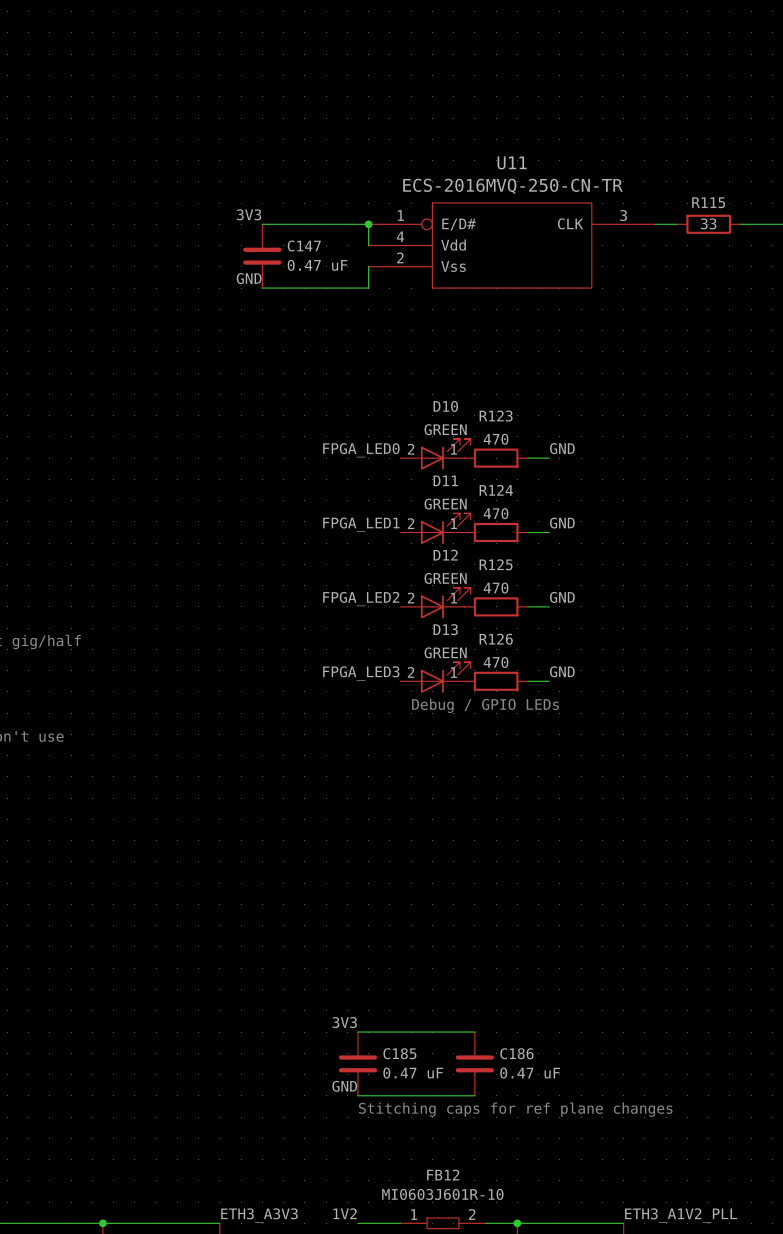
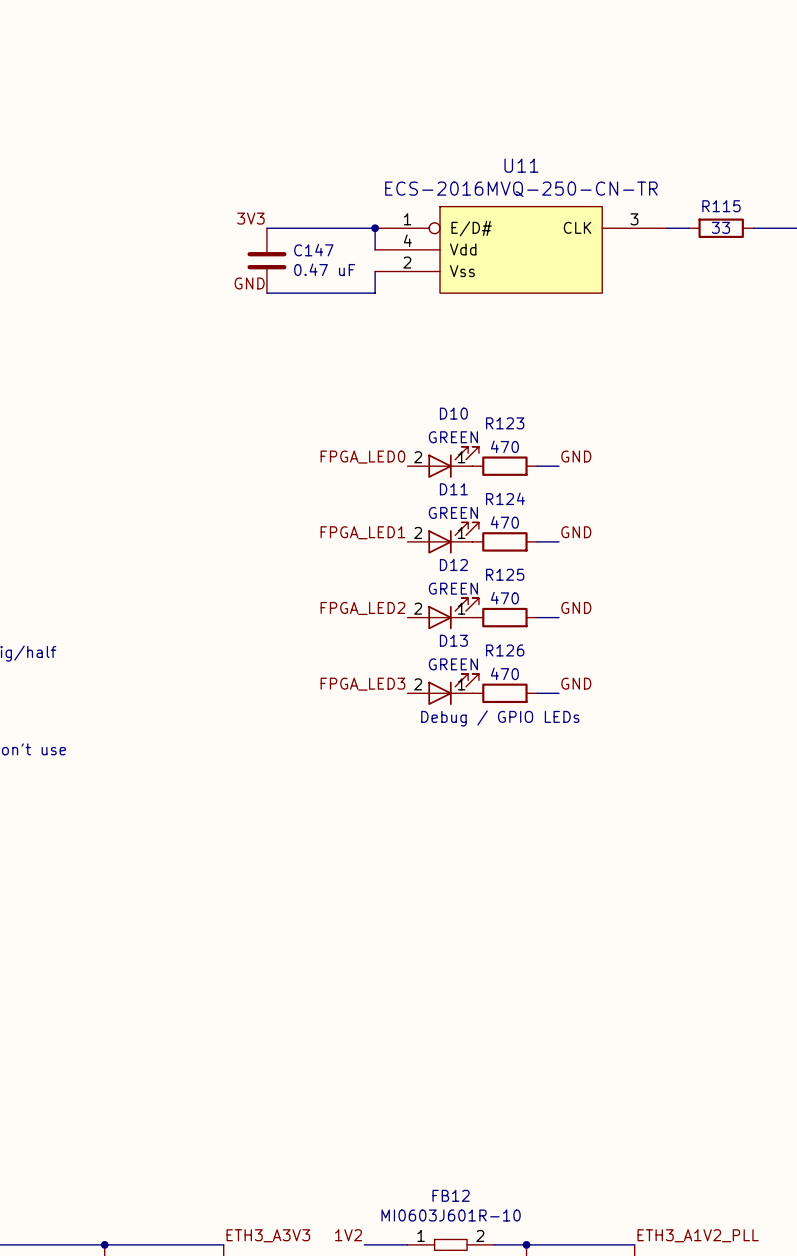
label: 3V3 (344, 1022) -> none
wire: (357, 1032) (474, 1032) -> none
C185: 0.47 uF (357, 1063) -> none
C186: 0.47 uF (474, 1063) -> none
label: GND (344, 1086) -> none
wire: (357, 1095) (474, 1095) -> none
text: Stitching caps for ref plane changes (515, 1109) -> none

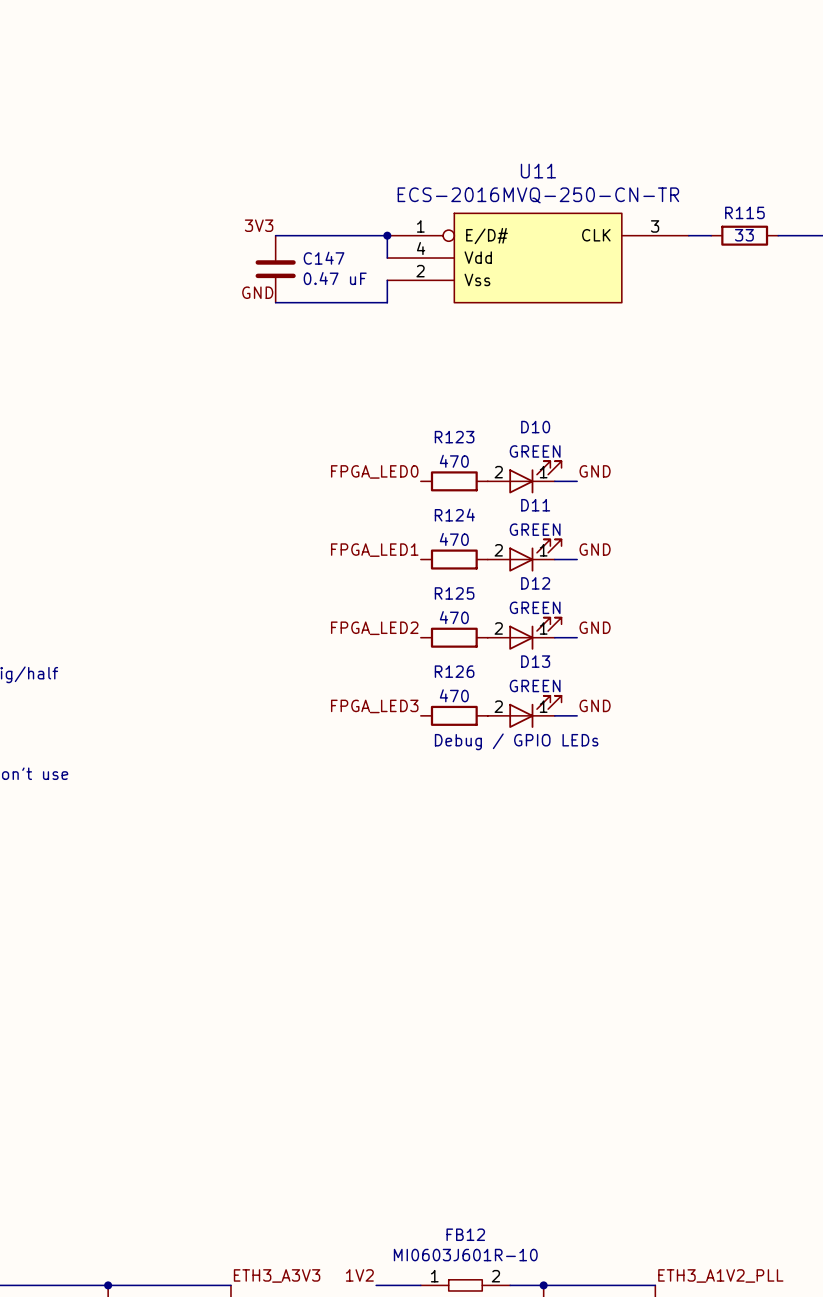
D10 position: (443, 462) -> (524, 477)
R123 position: (504, 466) -> (454, 481)
D11 position: (443, 538) -> (524, 555)
R124 position: (504, 541) -> (454, 559)
D12 position: (443, 613) -> (524, 633)
R125 position: (504, 617) -> (454, 637)
D13 position: (443, 689) -> (524, 711)
R126 position: (504, 693) -> (454, 715)

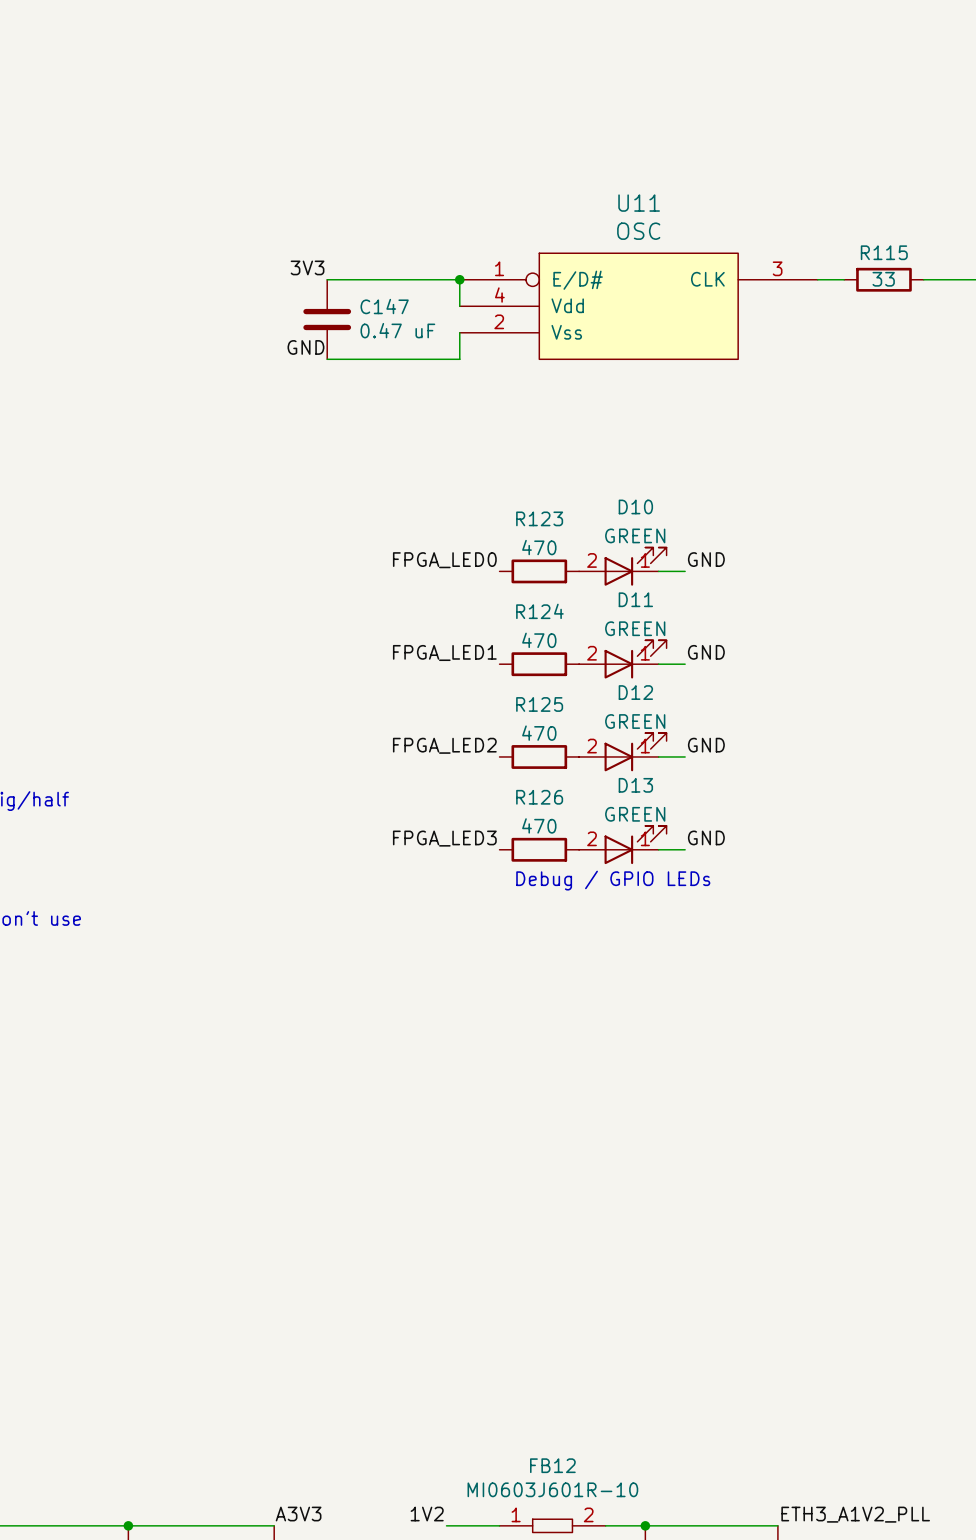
U11 value: ECS-2016MVQ-250-CN-TR (538, 195) -> OSC (638, 231)
label: ETH3_A3V3 (277, 1275) -> A3V3 (298, 1514)

